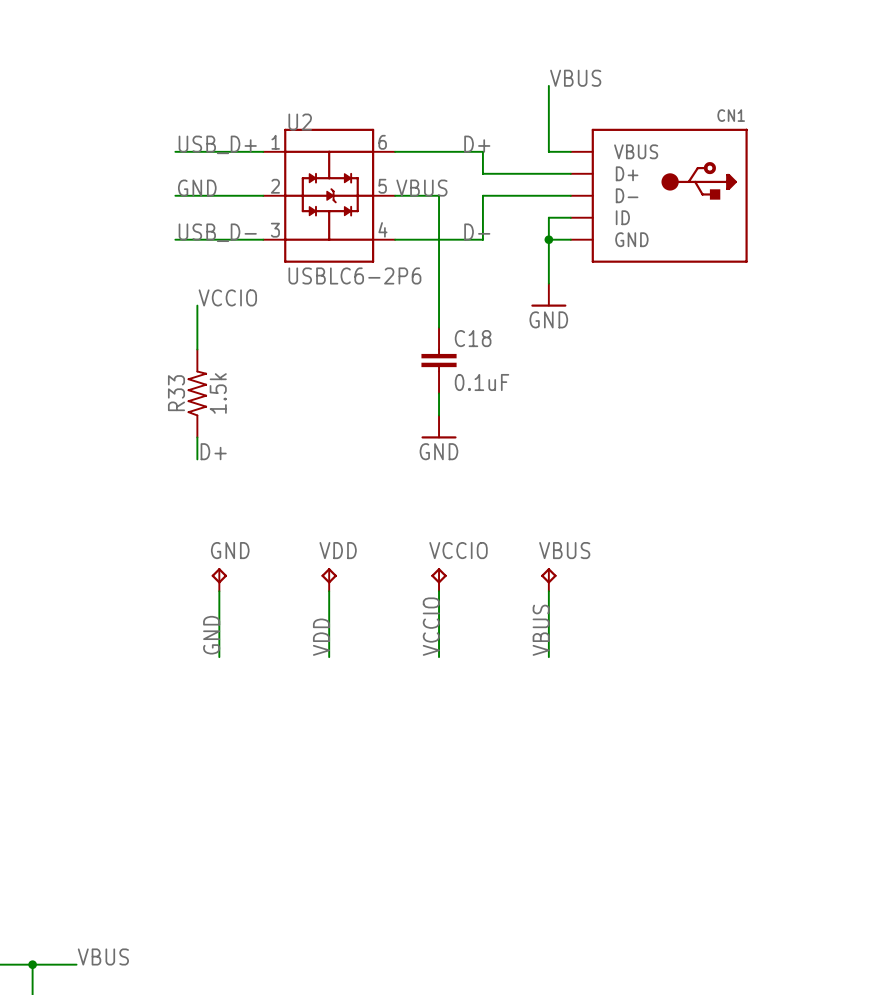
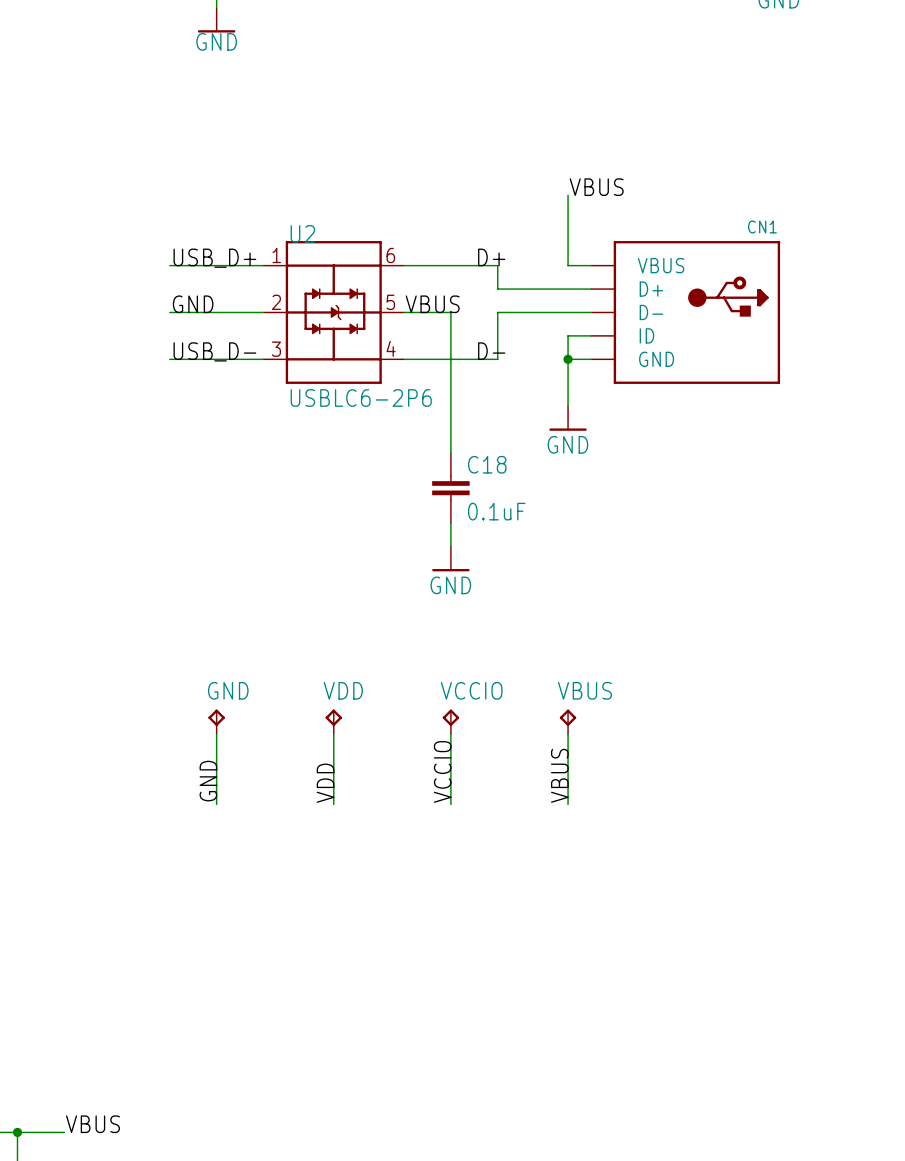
label: VCCIO (227, 297) -> none
wire: (197, 305) (197, 349) -> none
R33: 1.5k (197, 393) -> none
wire: (197, 437) (197, 459) -> none
label: D+ (213, 451) -> none

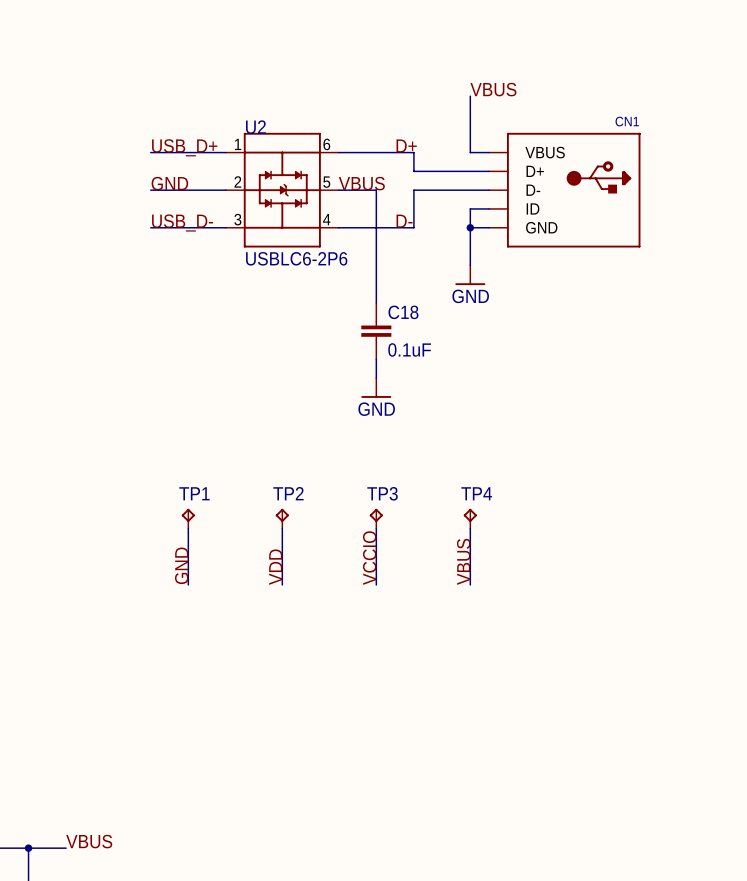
GND name: GND (228, 690) -> TP1 (194, 493)
VDD name: VDD (343, 690) -> TP2 (288, 493)
VCCIO name: VCCIO (471, 690) -> TP3 (382, 493)
VBUS name: VBUS (584, 690) -> TP4 (476, 493)

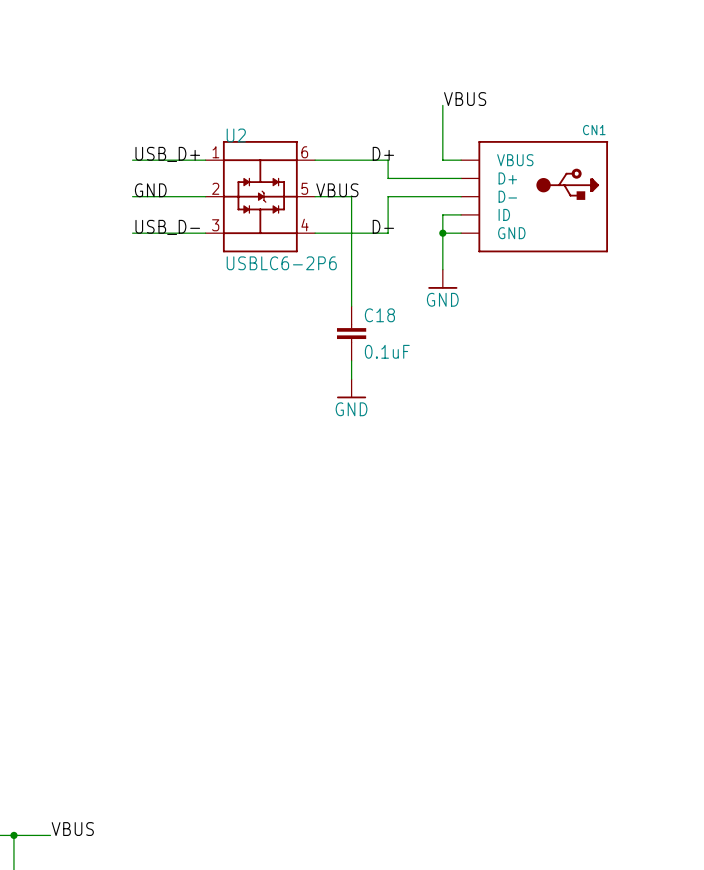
TP1: (188, 518) -> none
TP2: (282, 518) -> none
TP3: (376, 518) -> none
TP4: (470, 518) -> none
wire: (188, 528) (188, 584) -> none
wire: (282, 528) (282, 584) -> none
wire: (376, 528) (376, 584) -> none
wire: (470, 528) (470, 584) -> none
label: VCCIO (369, 558) -> none
label: VBUS (463, 561) -> none
label: GND (181, 565) -> none
label: VDD (275, 567) -> none

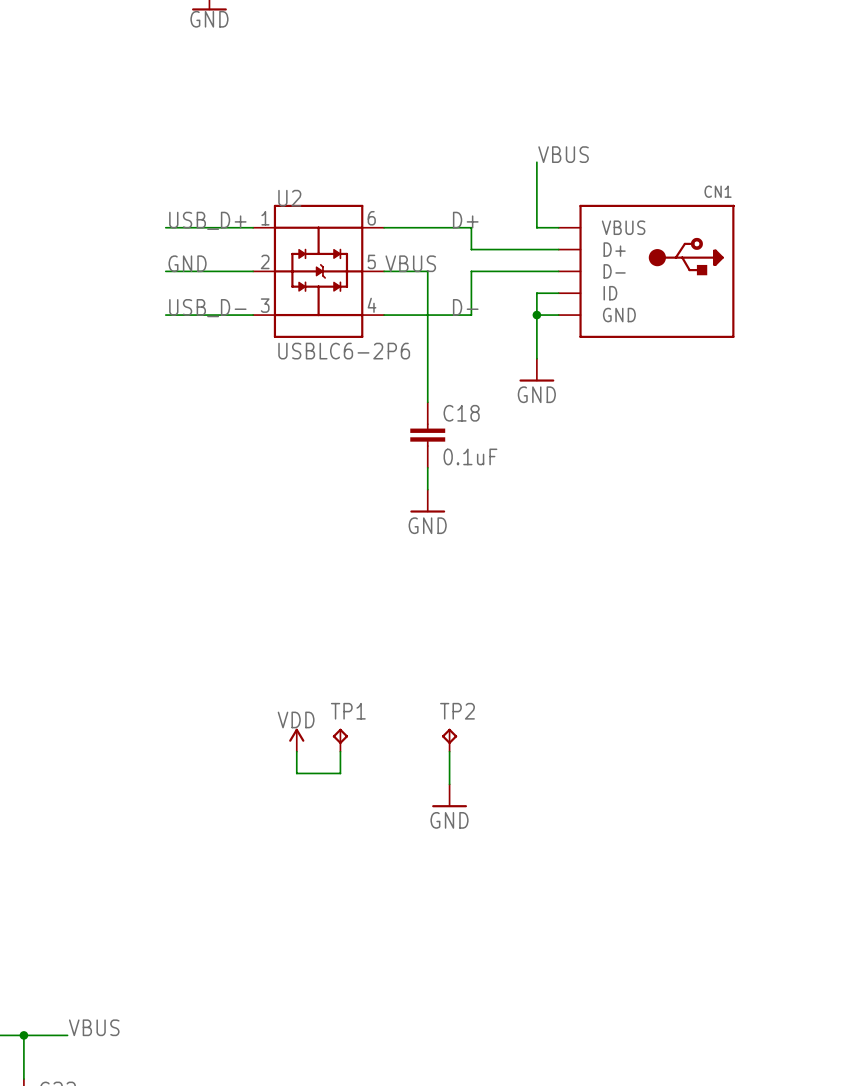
power symbol: none -> VDD (296, 740)
TP1: none -> (340, 740)
TP2: none -> (449, 740)
wire: none -> (296, 751) (296, 773) (340, 773) (340, 751)
wire: none -> (449, 751) (449, 784)
power symbol: none -> GND (449, 795)

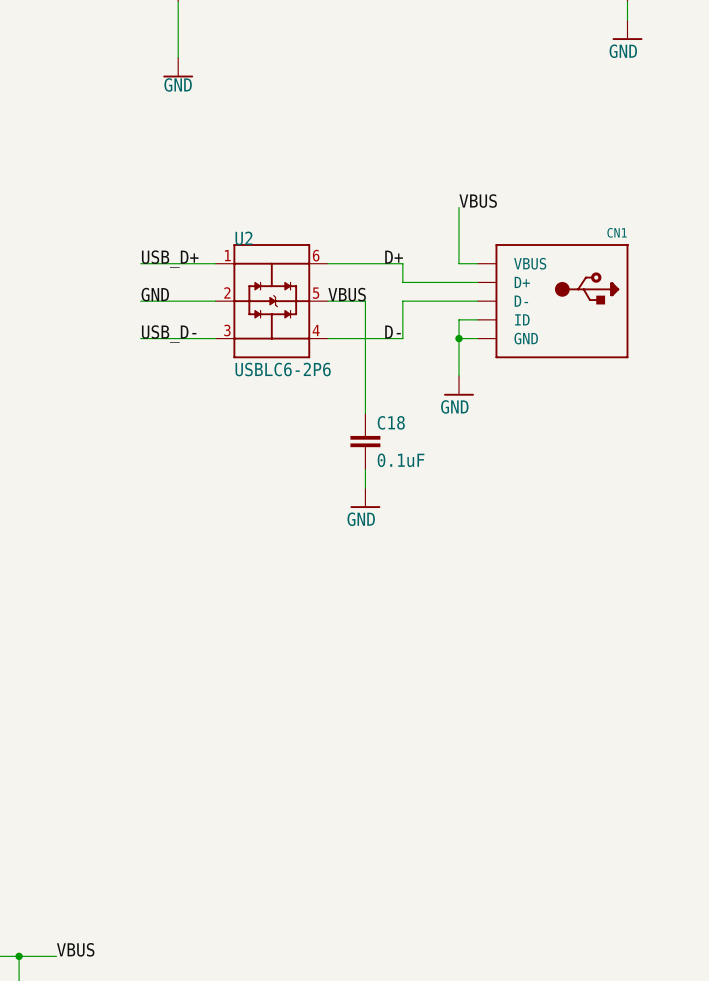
power symbol: VDD (296, 740) -> none
TP1: (340, 740) -> none
TP2: (449, 740) -> none
wire: (296, 751) (296, 773) (340, 773) (340, 751) -> none
wire: (449, 751) (449, 784) -> none
power symbol: GND (449, 795) -> none

